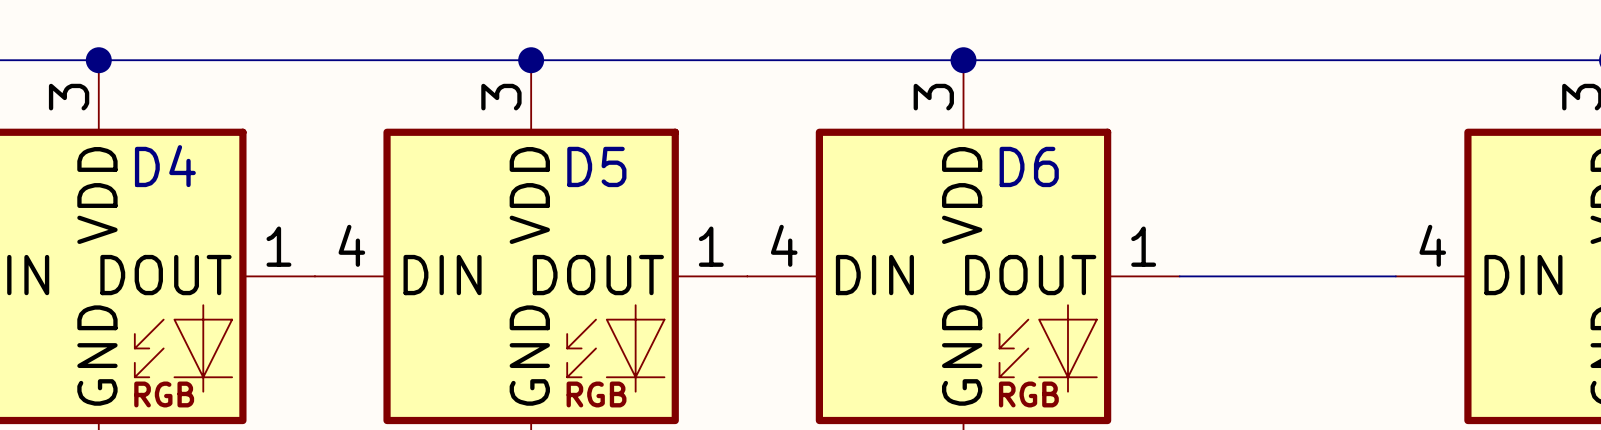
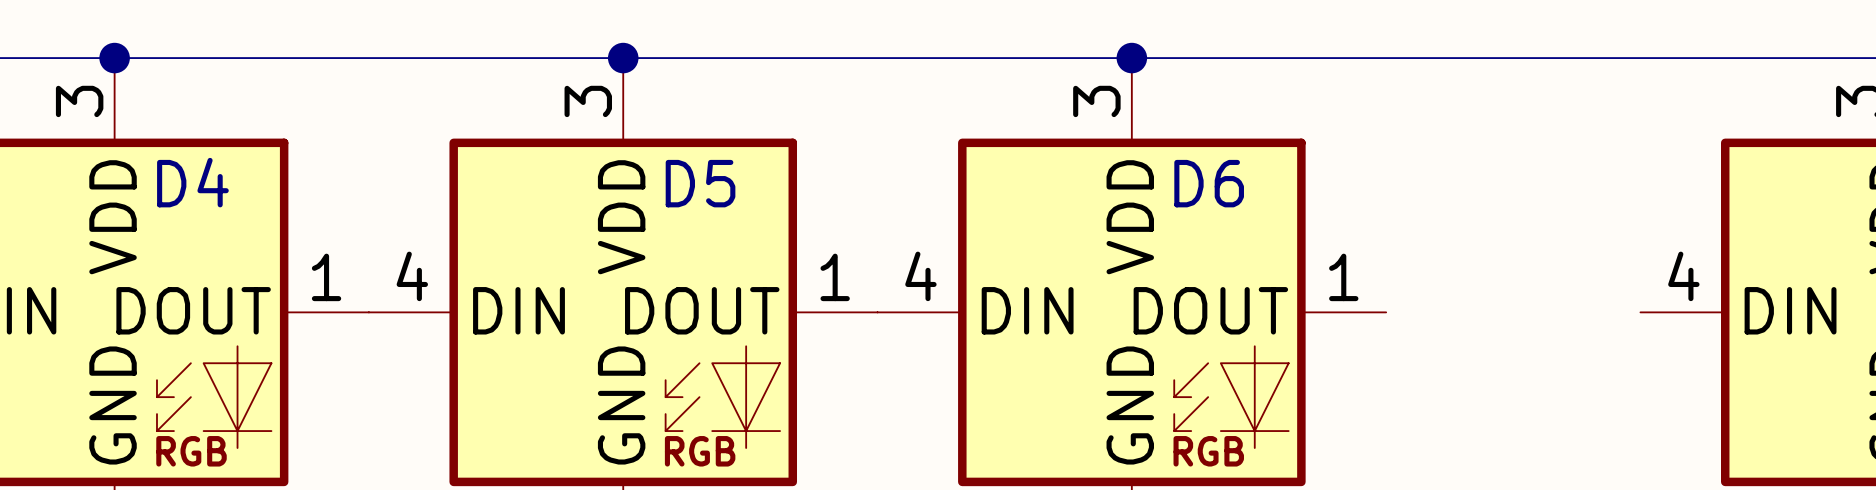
wire: (1179, 276) (1395, 276) -> none

